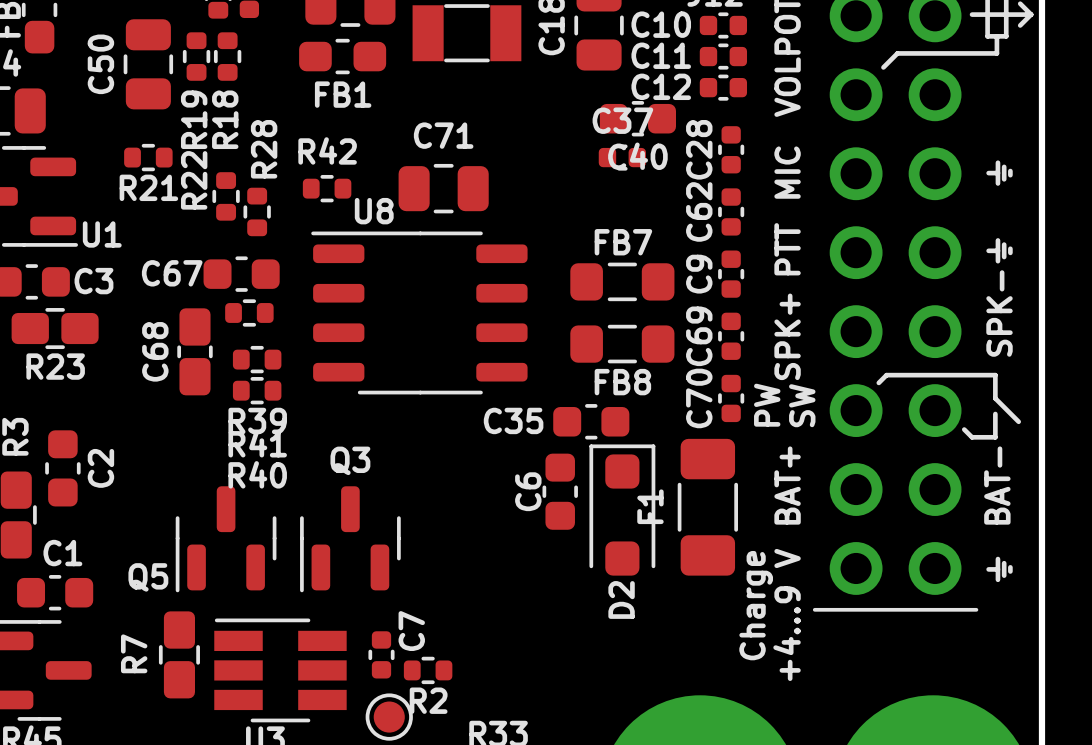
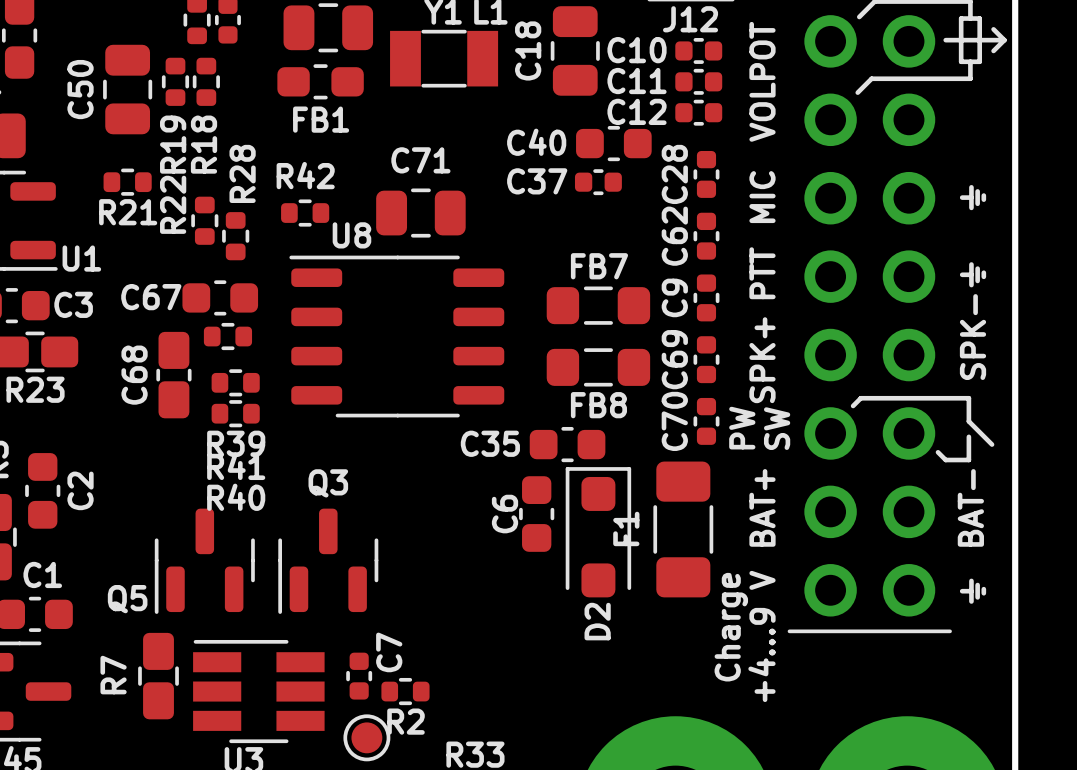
C37 name position: C37 (622, 120) -> C37 (537, 181)
C40 name position: C40 (637, 156) -> C40 (536, 142)

